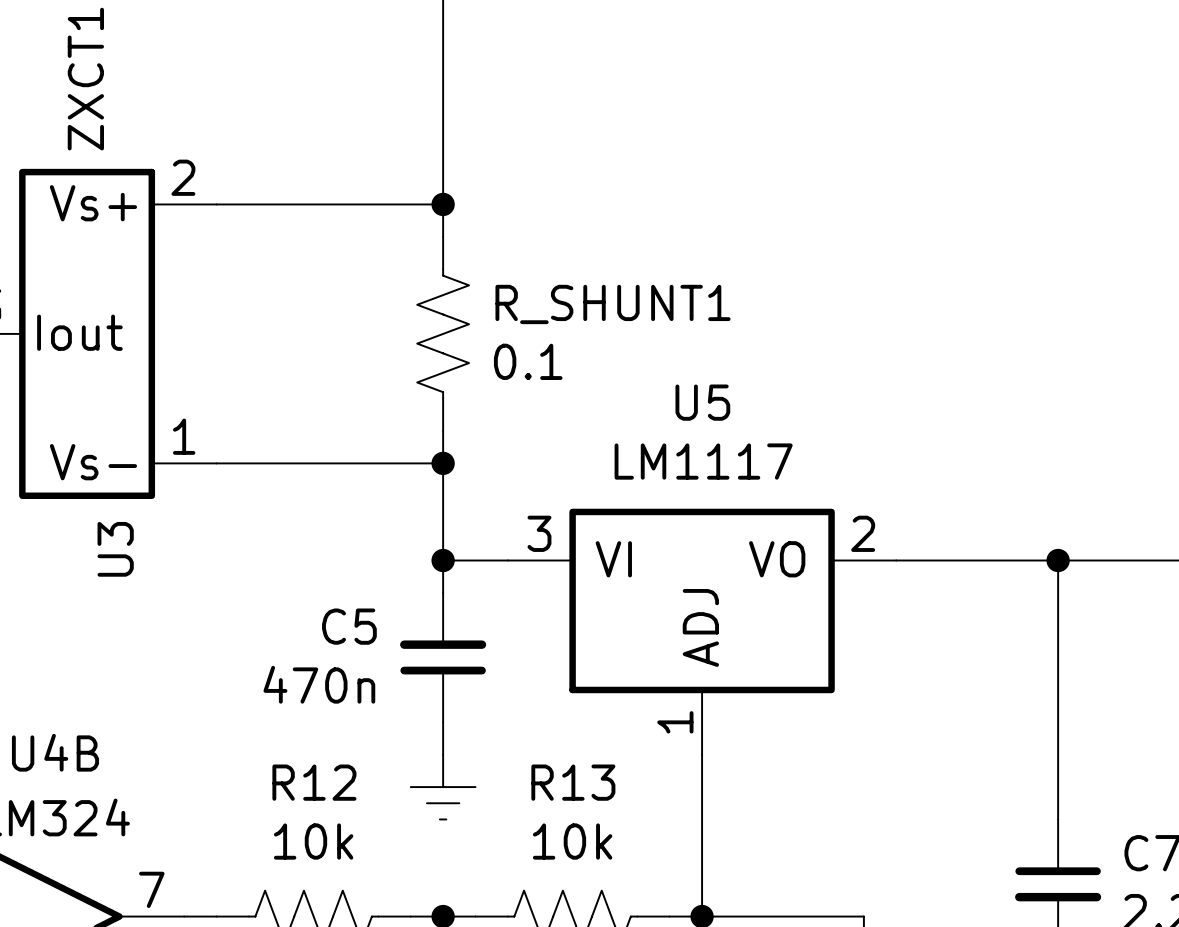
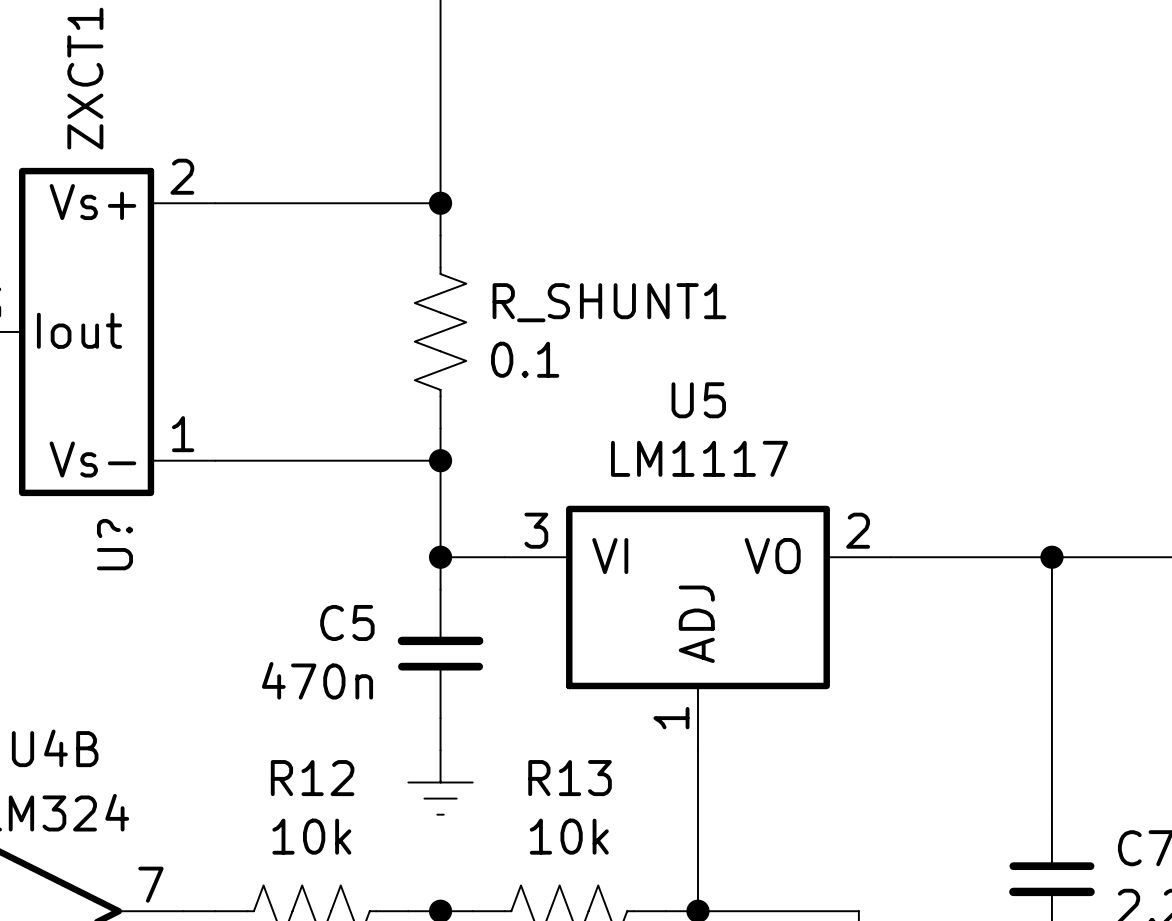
U3 name: U3 (115, 549) -> U? (114, 544)

